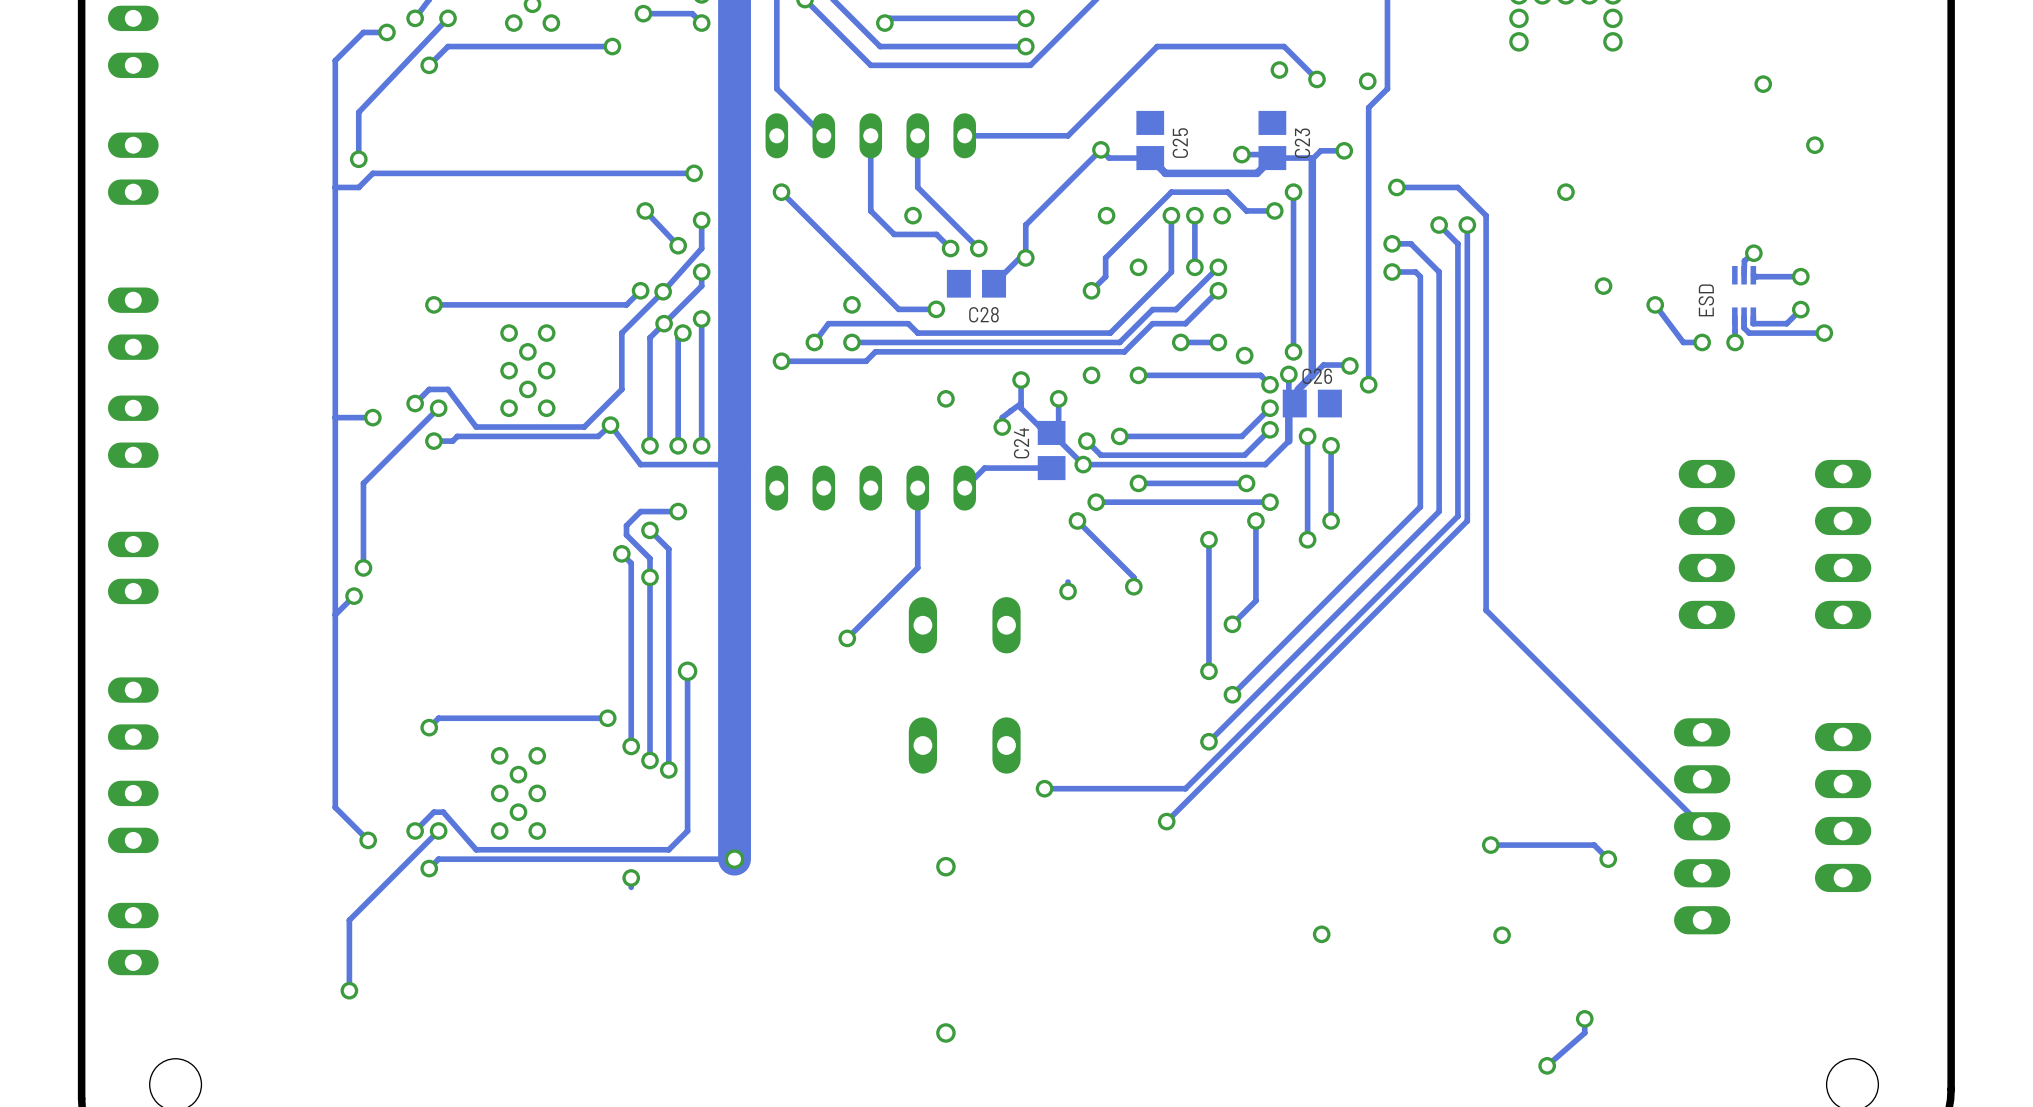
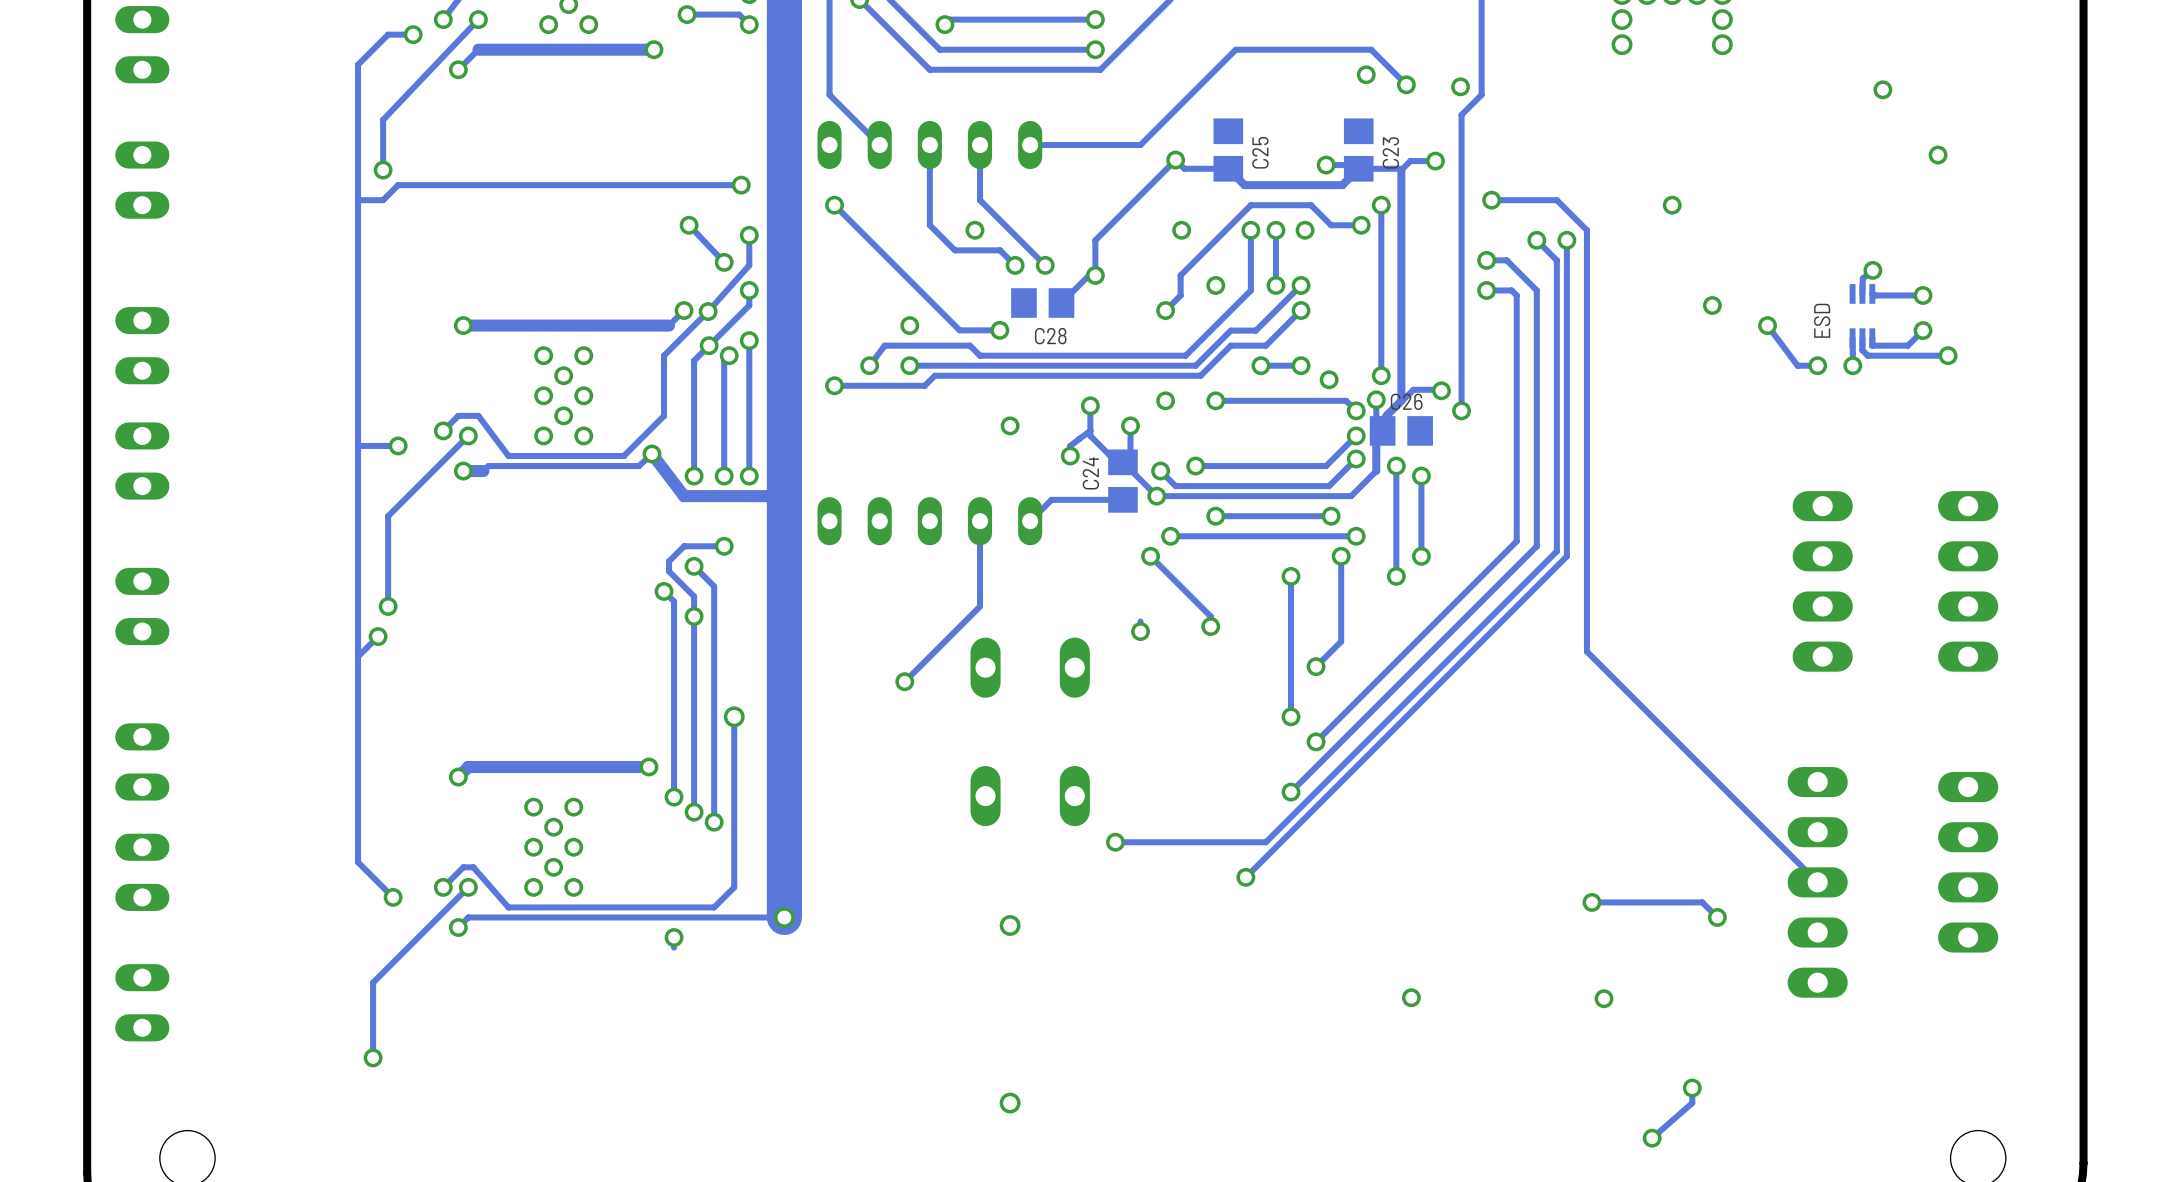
track width: thin (612, 46) (448, 46) -> thick (653, 49) (478, 49)
track width: thin (626, 304) (433, 304) -> thick (669, 325) (463, 325)
track width: thin (610, 425) (640, 464) (734, 464) -> thick (651, 453) (684, 496) (784, 496)
track width: thin (452, 441) (433, 441) -> thick (483, 471) (463, 471)
track width: thin (607, 718) (438, 718) (429, 727) -> thick (648, 766) (468, 766) (458, 777)

